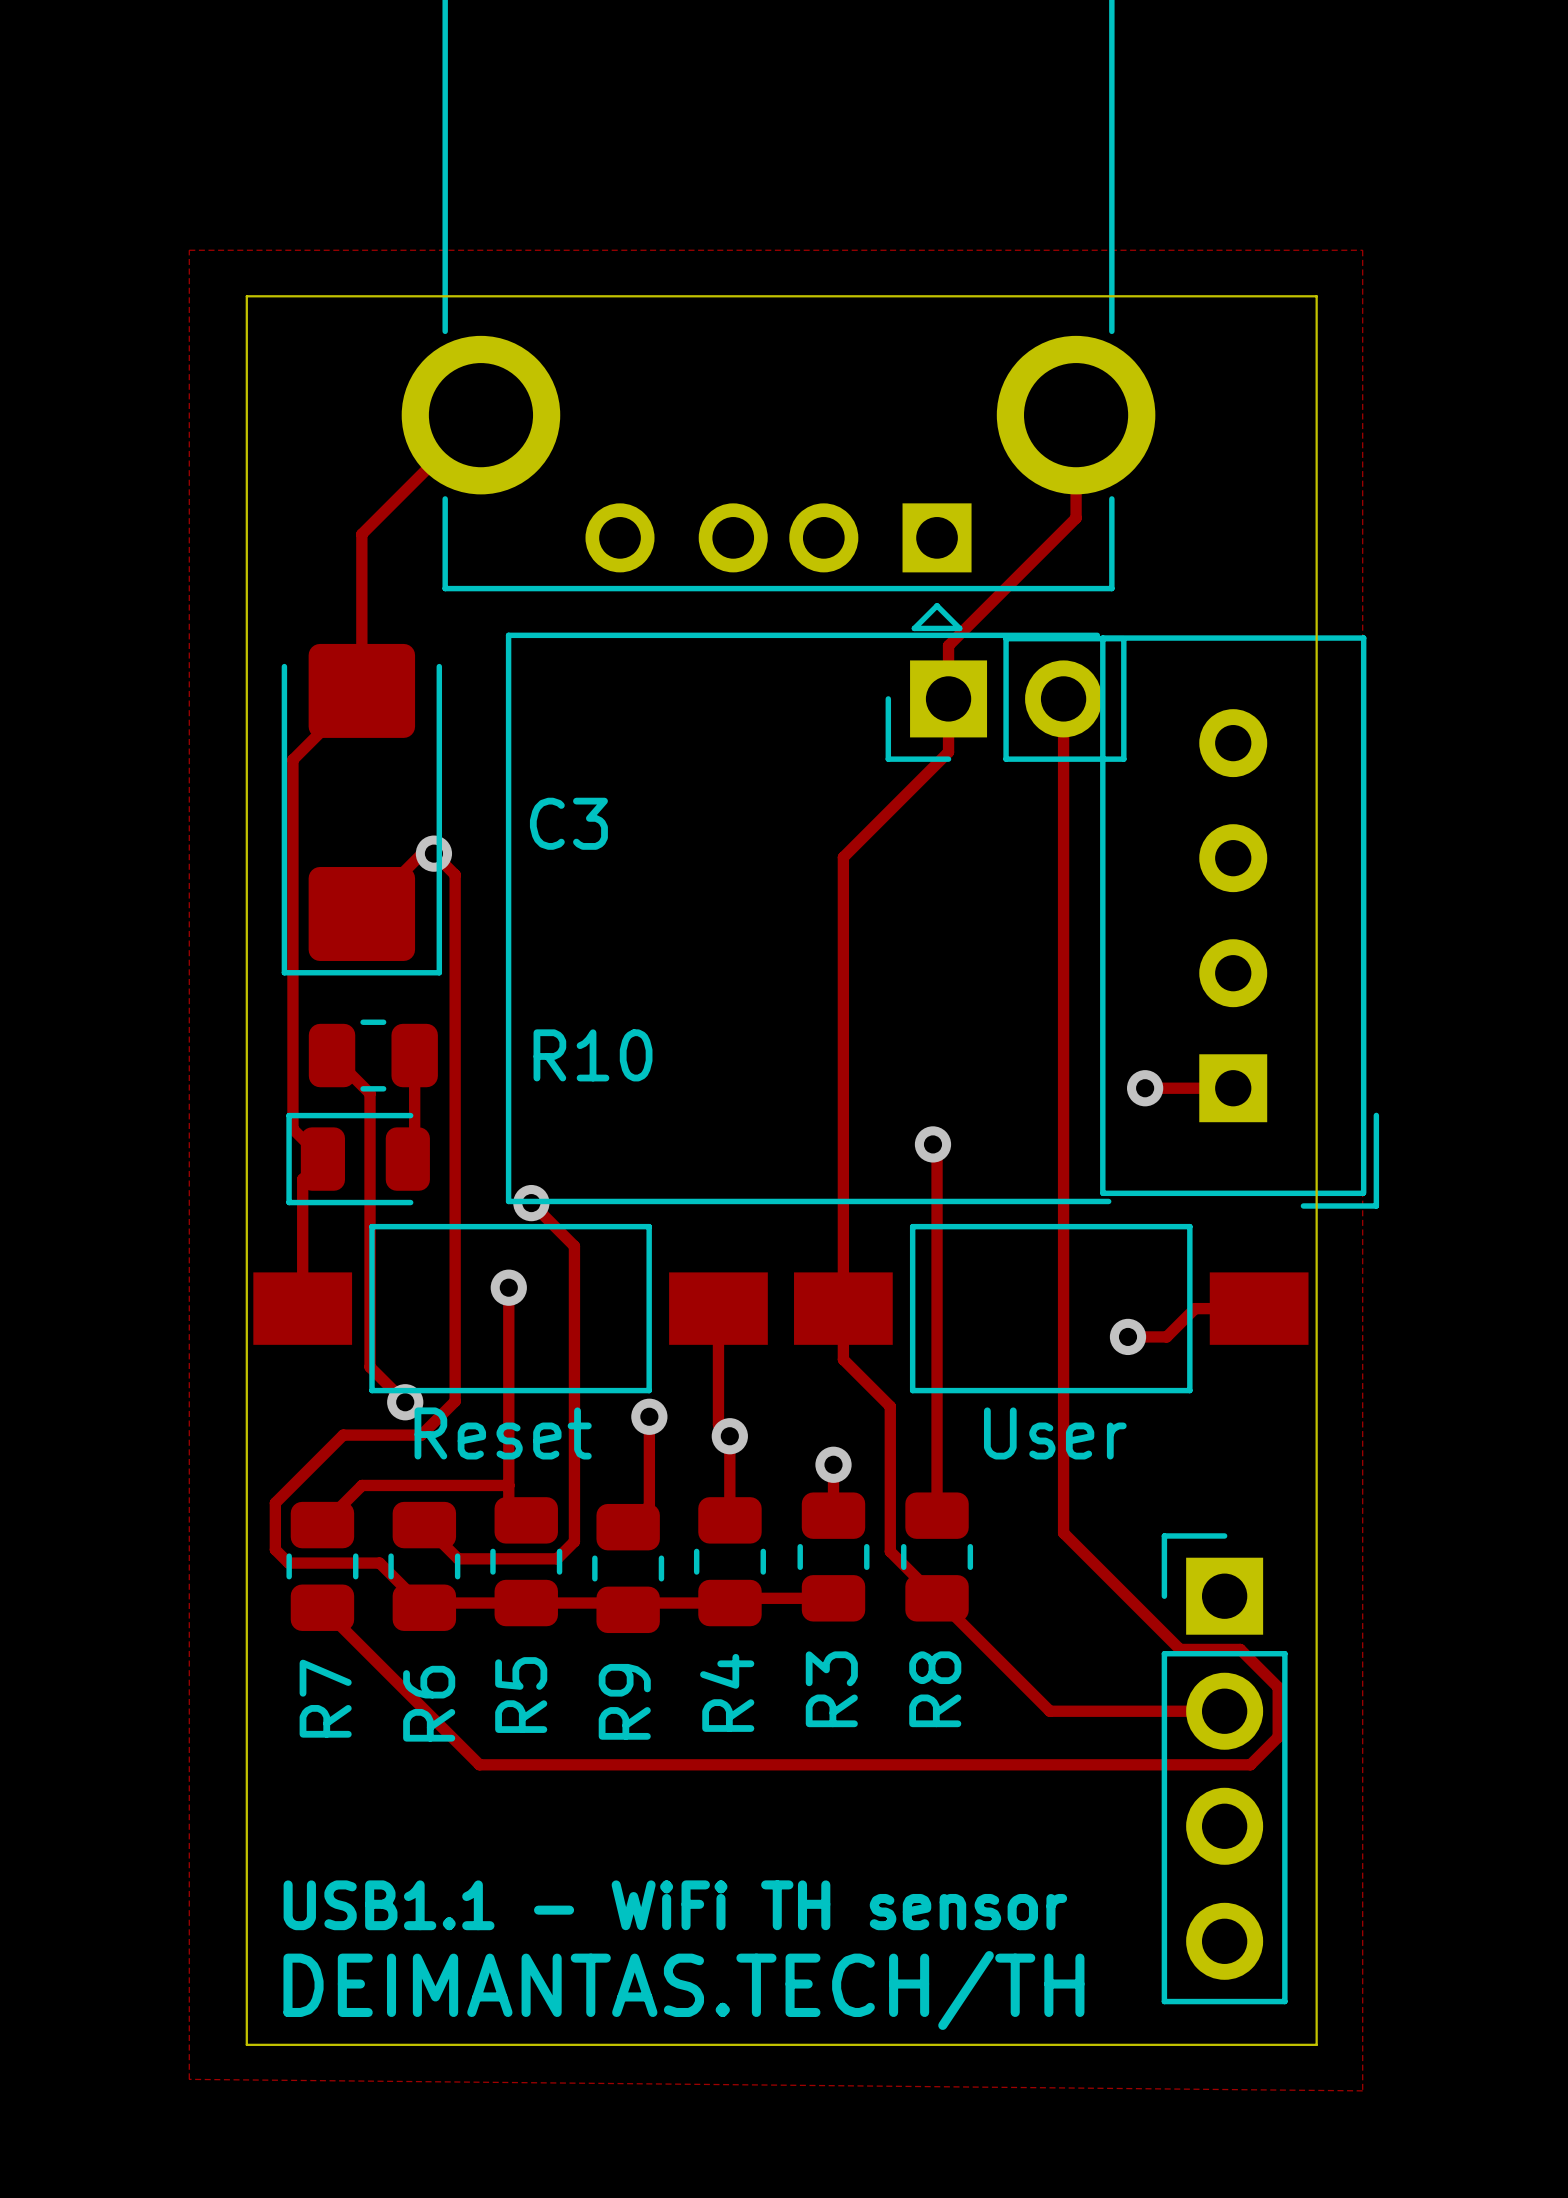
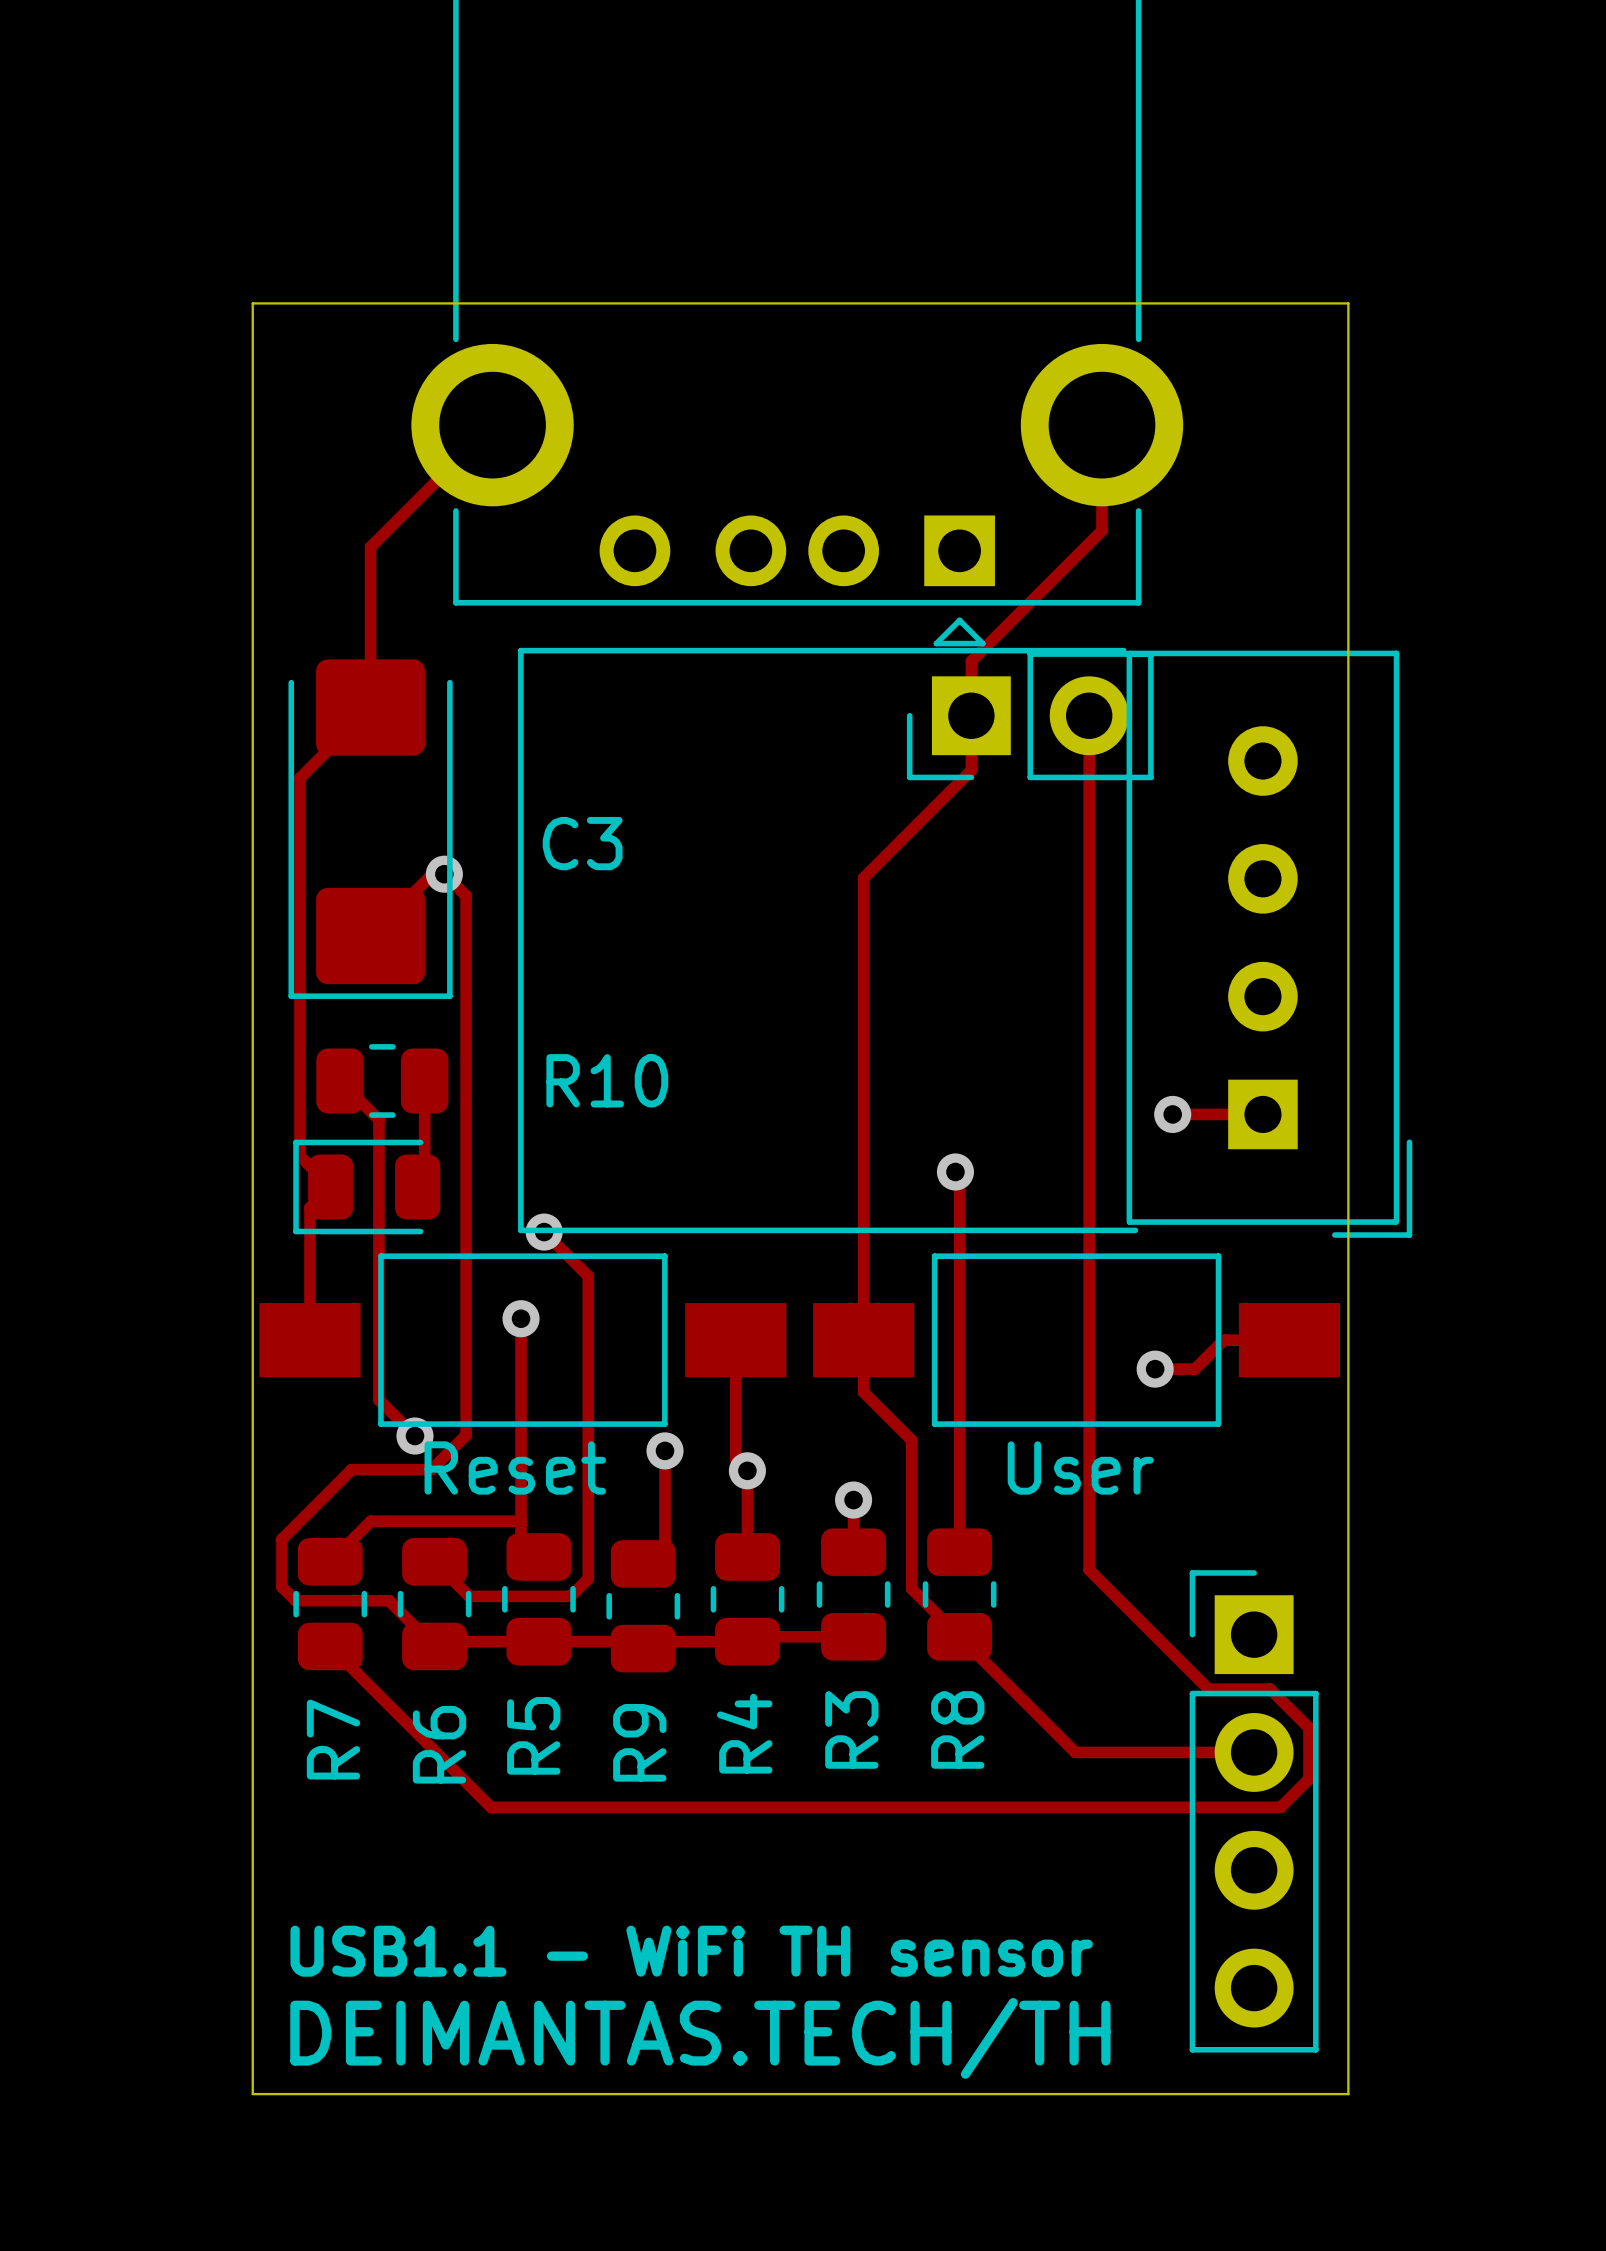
zone outline: (189, 250) (189, 2079) (1362, 2090) (1362, 250) (189, 250) -> none

